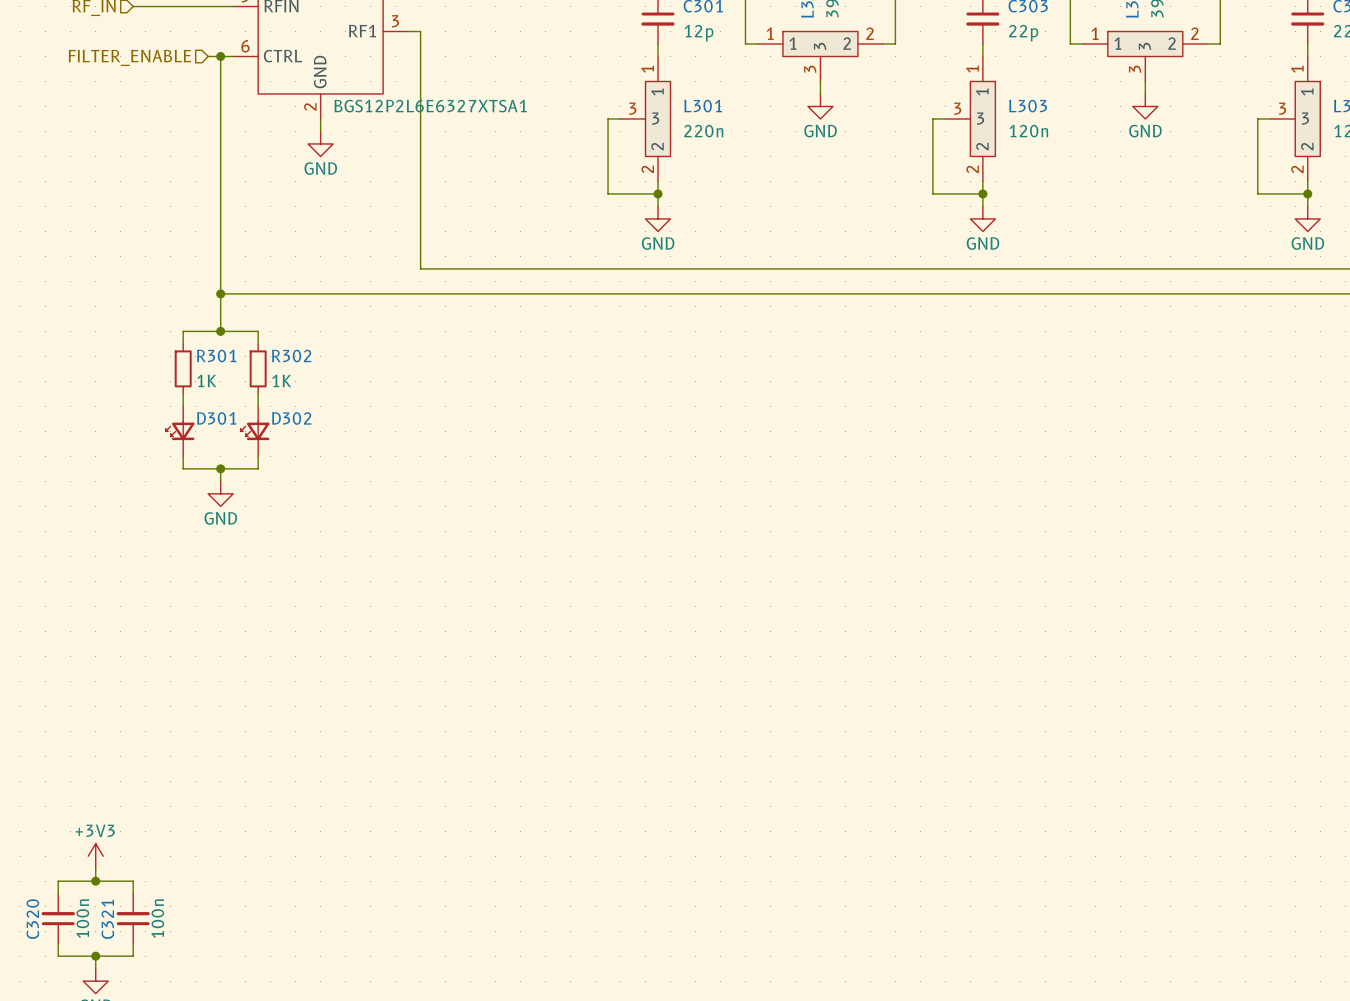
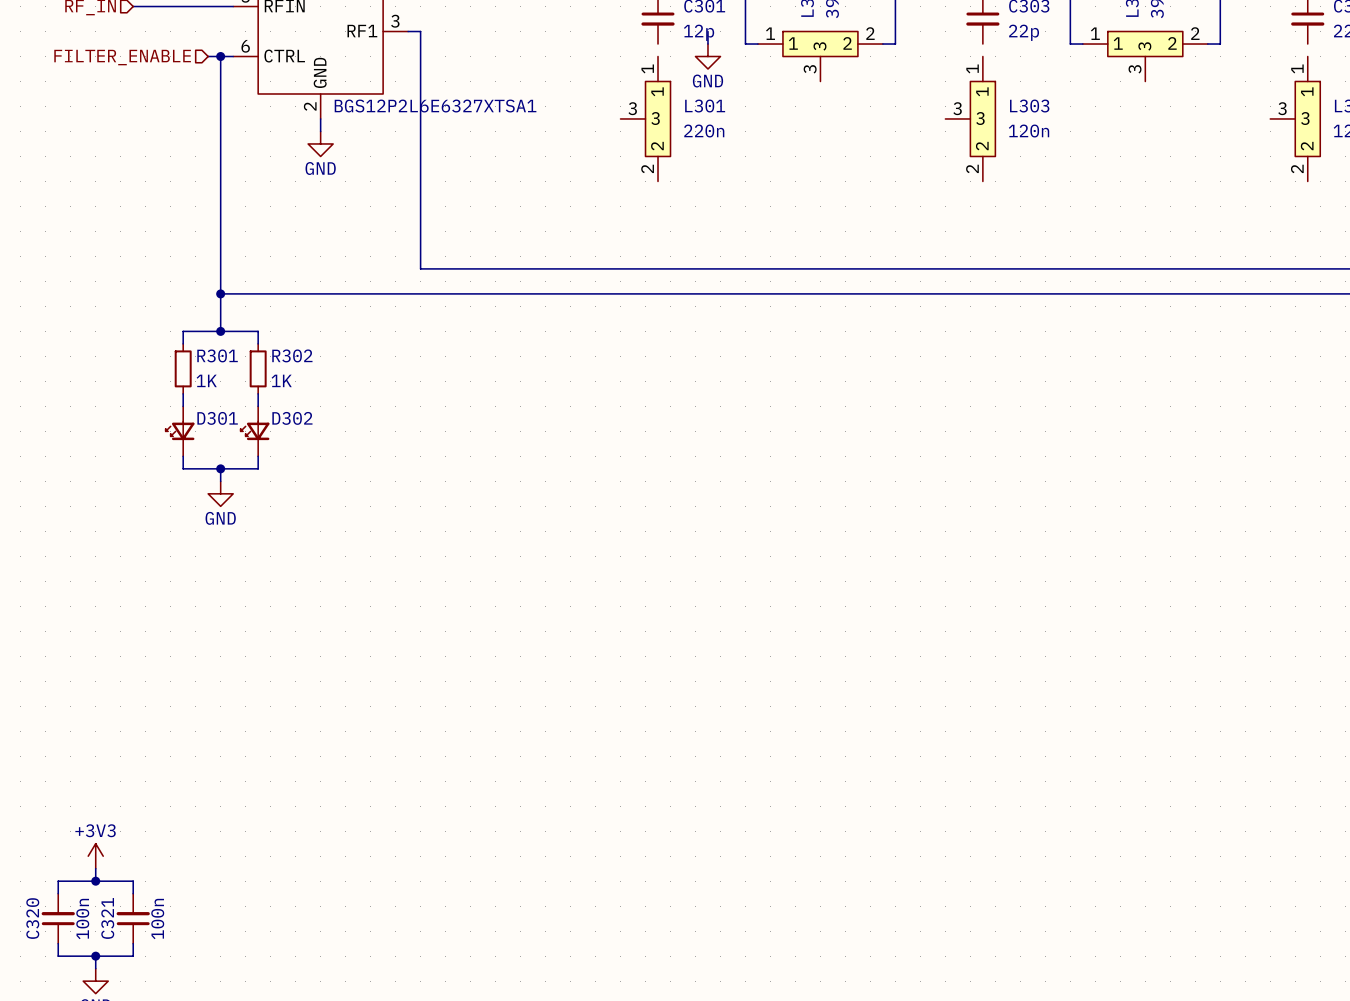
wire: (658, 44) (658, 56) -> (707, 31) (707, 44)
wire: (982, 44) (982, 56) -> none
wire: (1307, 44) (1307, 56) -> none
power symbol: none -> GND (707, 56)
wire: (820, 81) (820, 93) -> none
wire: (1145, 81) (1145, 93) -> none
power symbol: GND (820, 106) -> none
power symbol: GND (1145, 106) -> none
wire: (620, 118) (608, 118) (608, 193) (658, 193) -> none
wire: (945, 118) (932, 118) (932, 193) (982, 193) -> none
wire: (1270, 118) (1257, 118) (1257, 193) (1307, 193) -> none
wire: (658, 181) (658, 206) -> none
wire: (982, 181) (982, 206) -> none
wire: (1307, 181) (1307, 206) -> none
junction: (658, 193) -> none
junction: (982, 193) -> none
junction: (1307, 193) -> none
power symbol: GND (658, 218) -> none
power symbol: GND (982, 218) -> none
power symbol: GND (1307, 218) -> none

